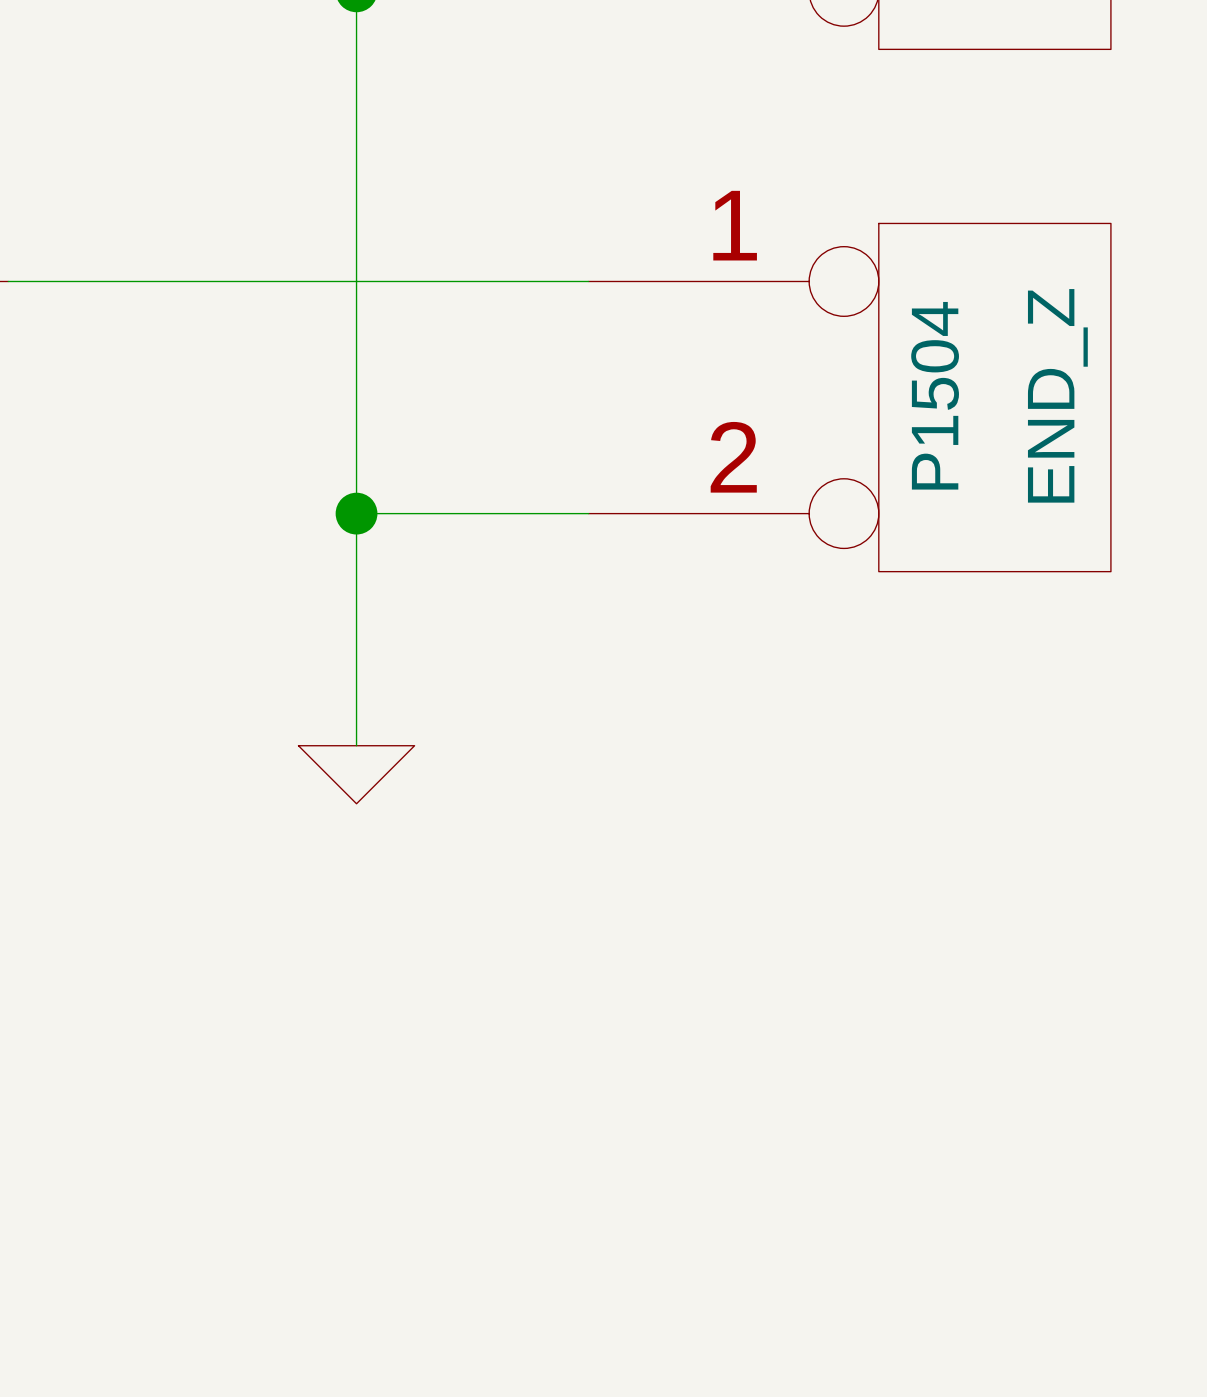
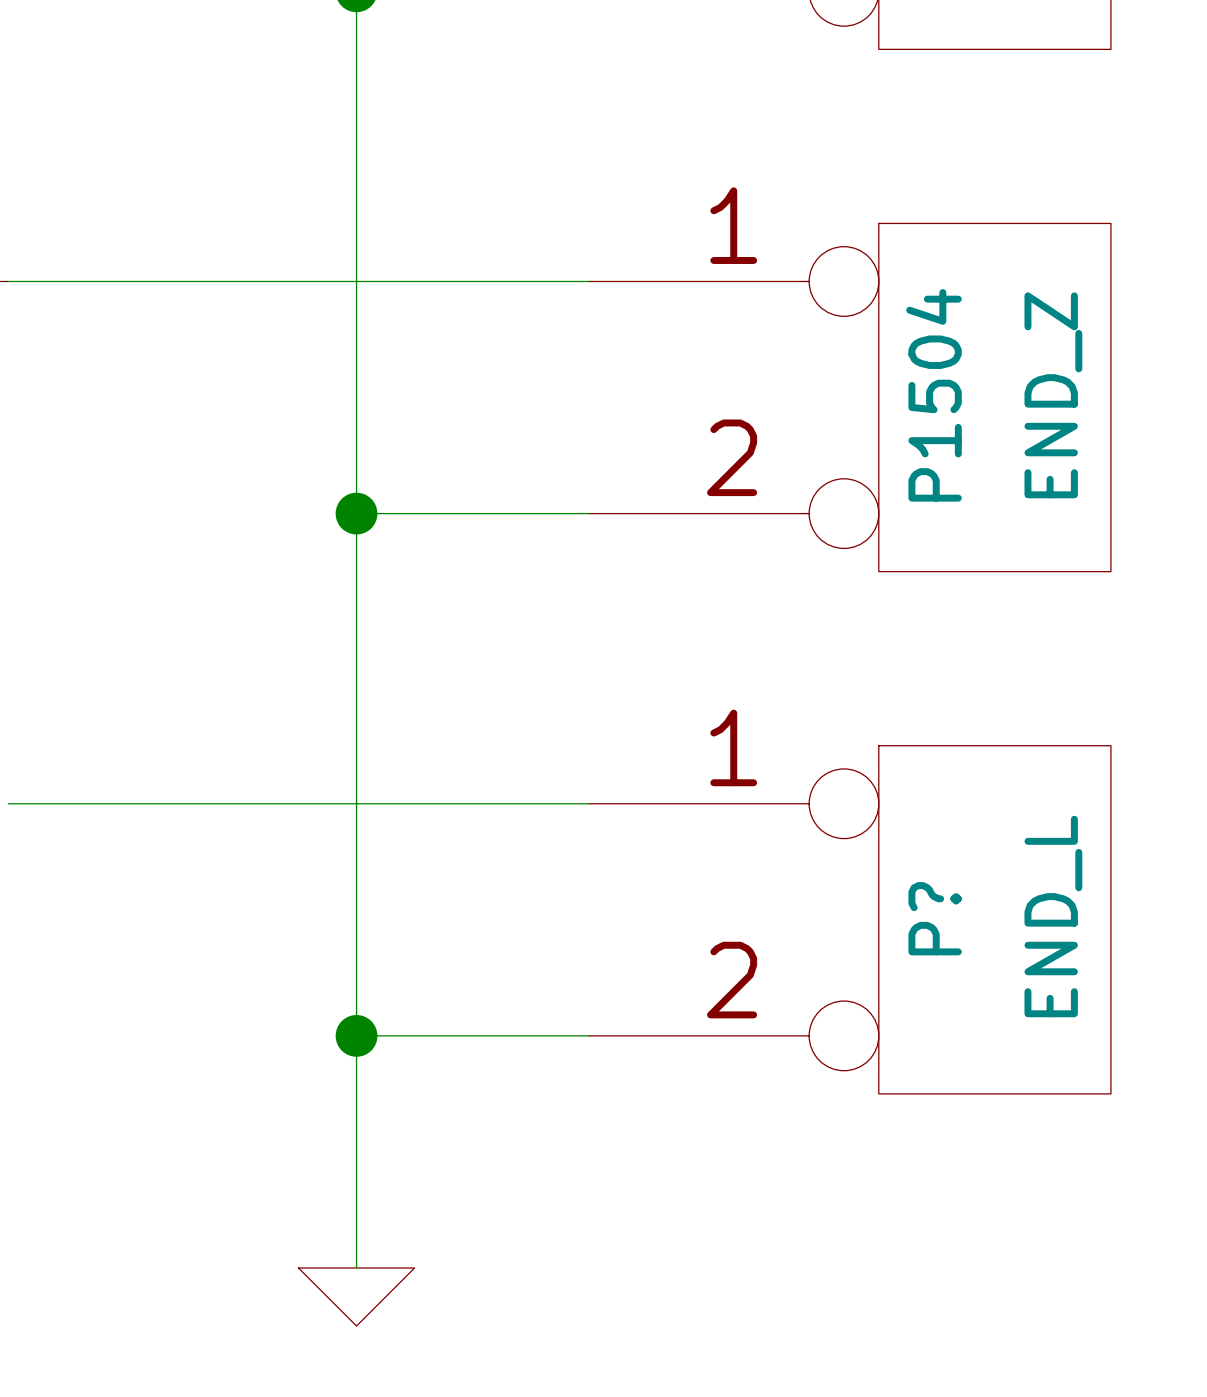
wire: none -> (356, 745) (356, 1268)
power symbol position: (356, 774) -> (356, 1297)
wire: none -> (8, 803) (588, 803)
P?: none -> END_L (849, 919)
wire: none -> (356, 1035) (588, 1035)
junction: none -> (356, 1035)

